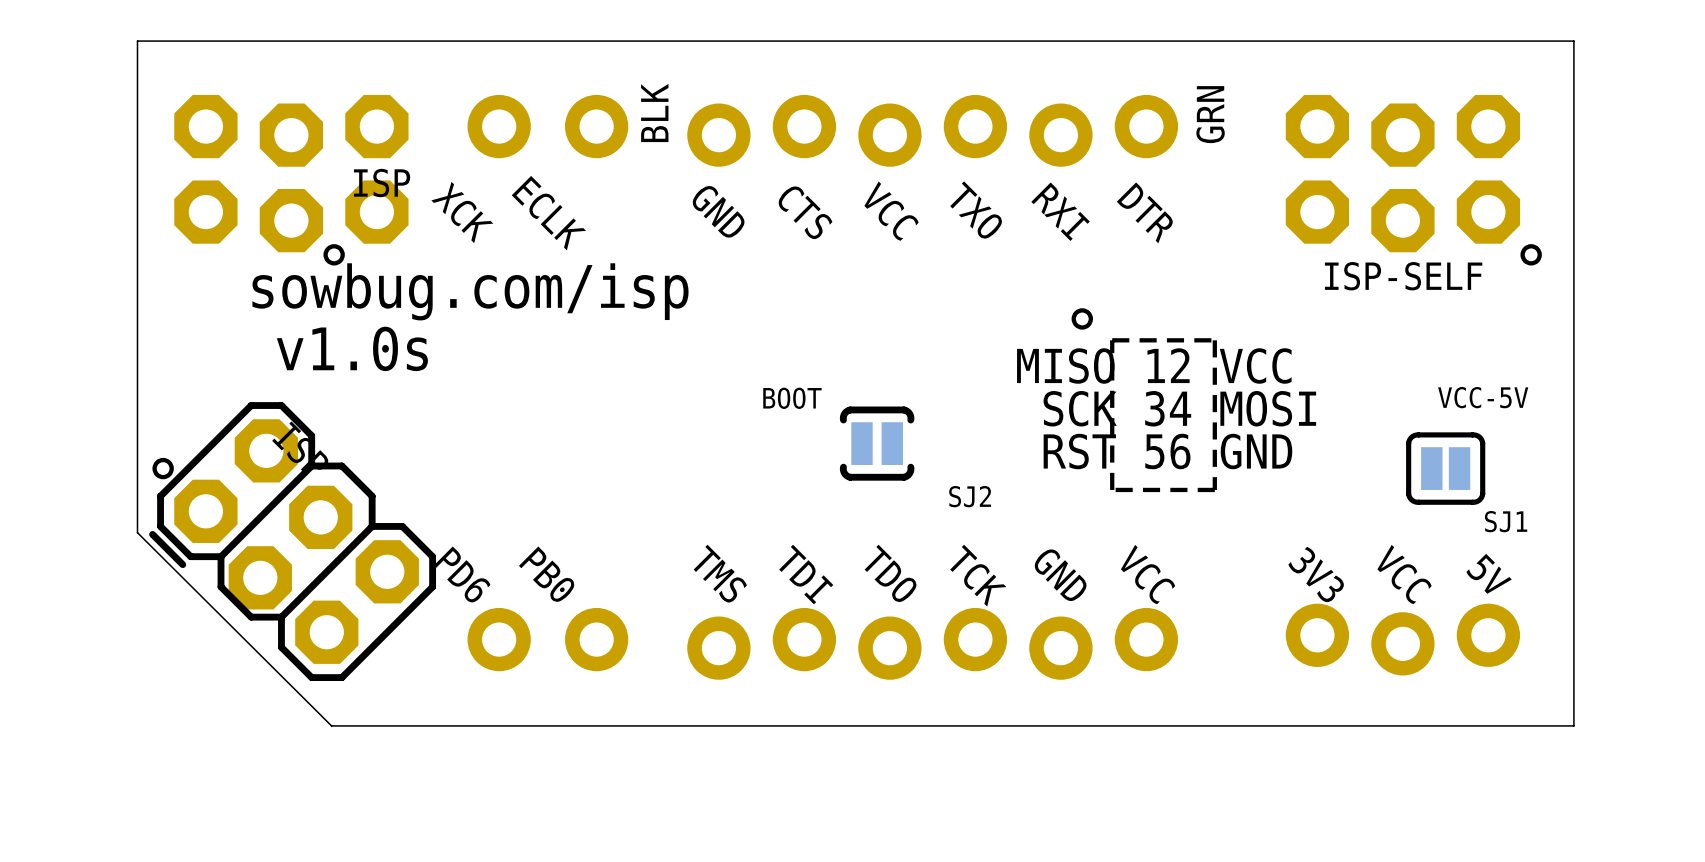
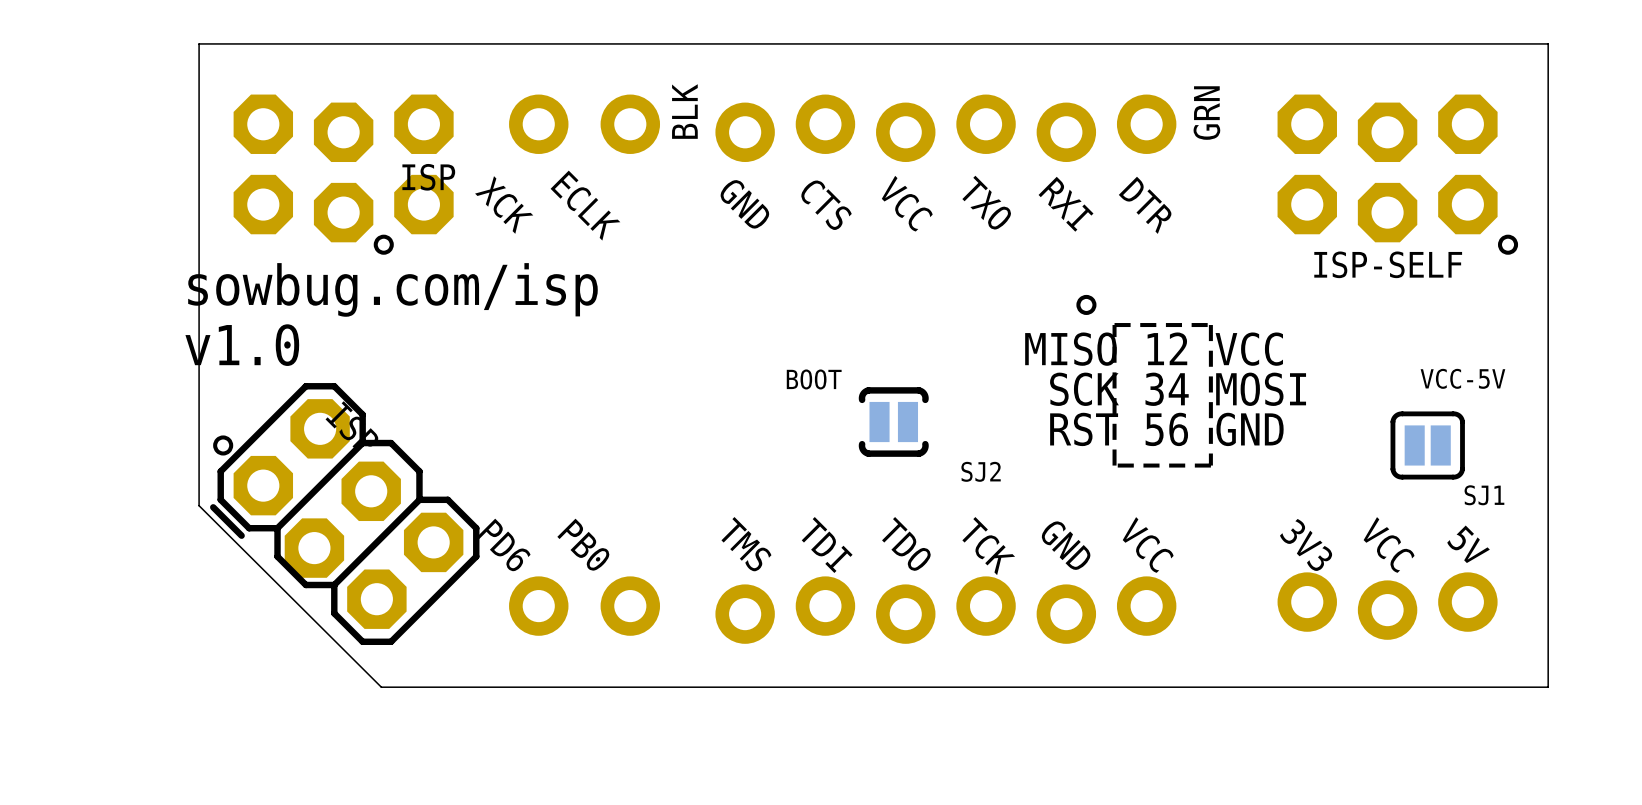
text position: sowbug.com/isp (470, 291) -> sowbug.com/isp (392, 289)
text: v1.0s (352, 348) -> v1.0 (242, 345)

